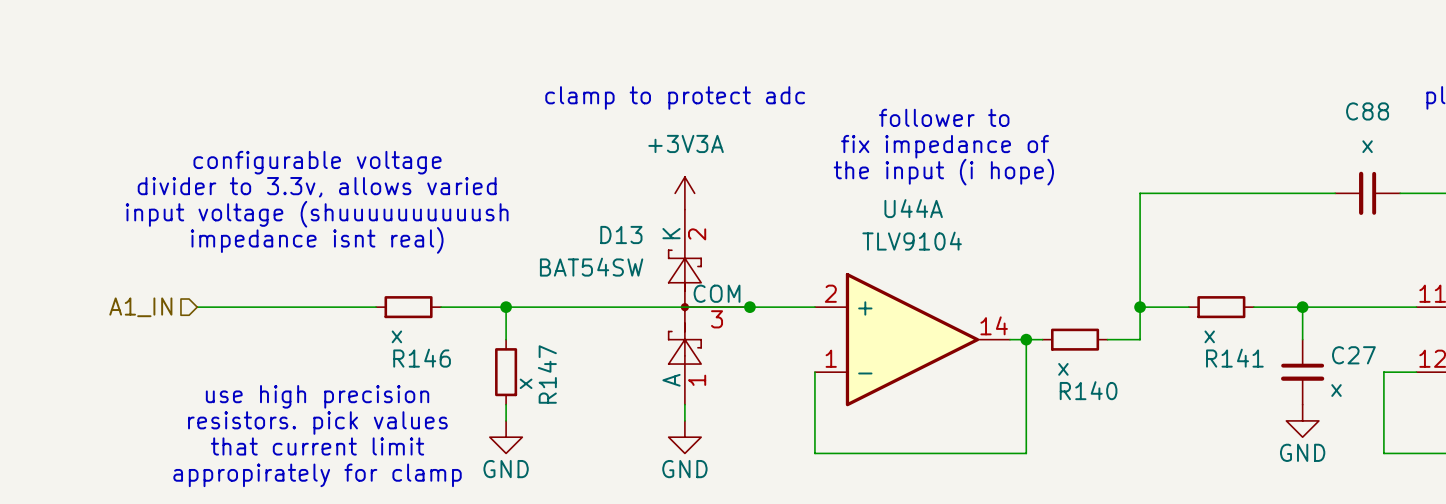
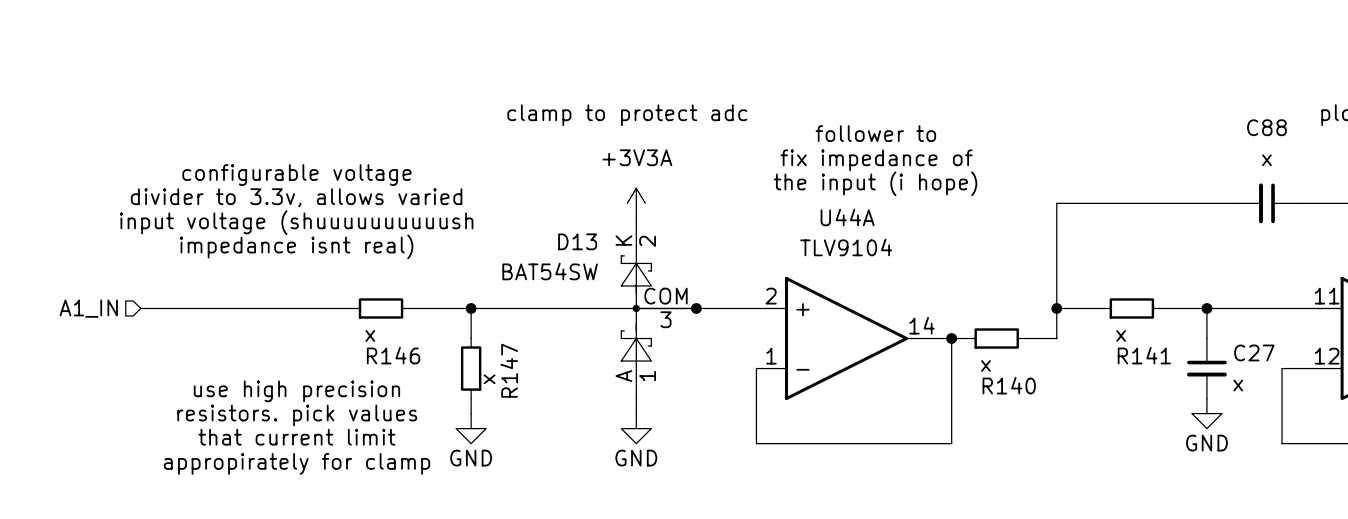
hierarchical label position: A1_IN (140, 307) -> A1_IN (88, 308)
wire: none -> (140, 308) (185, 308)

